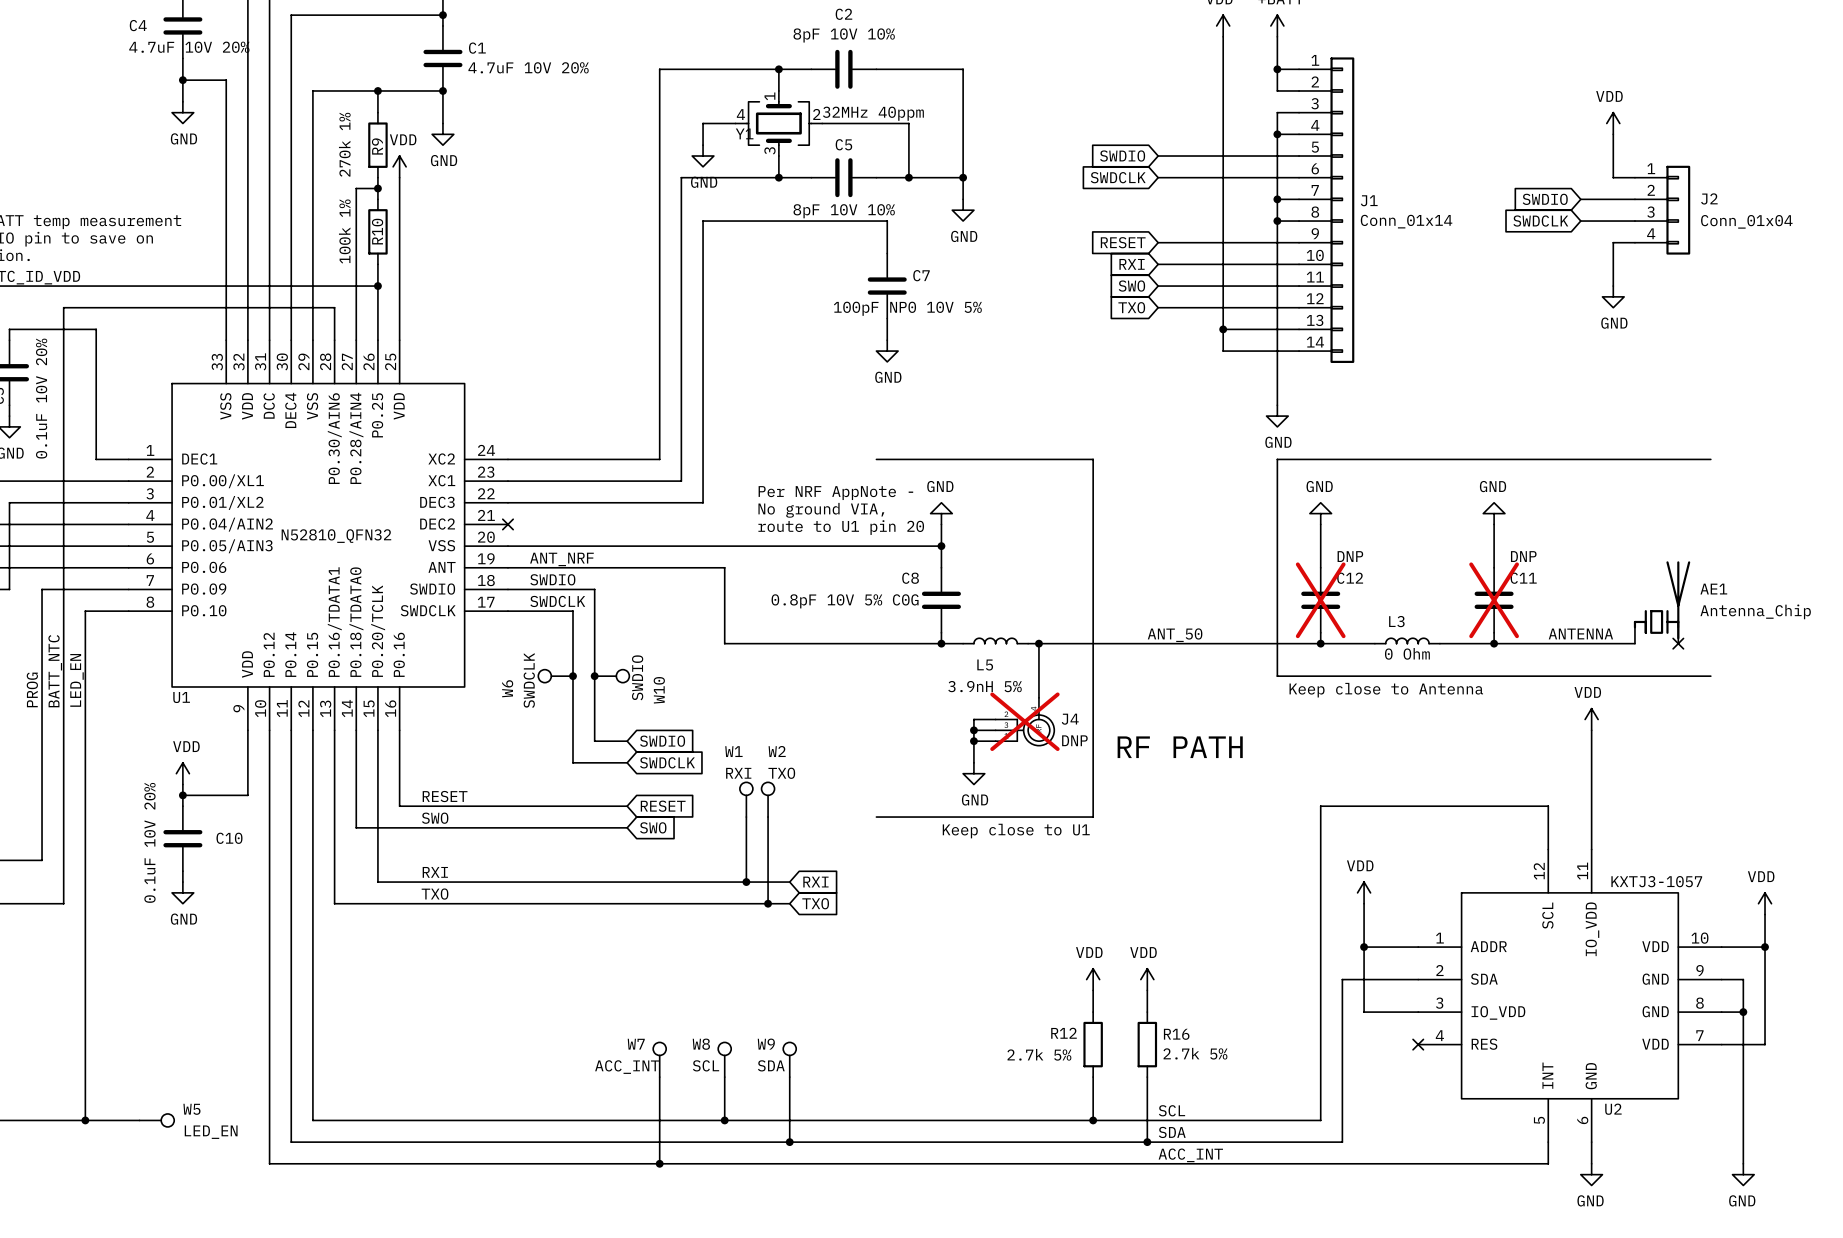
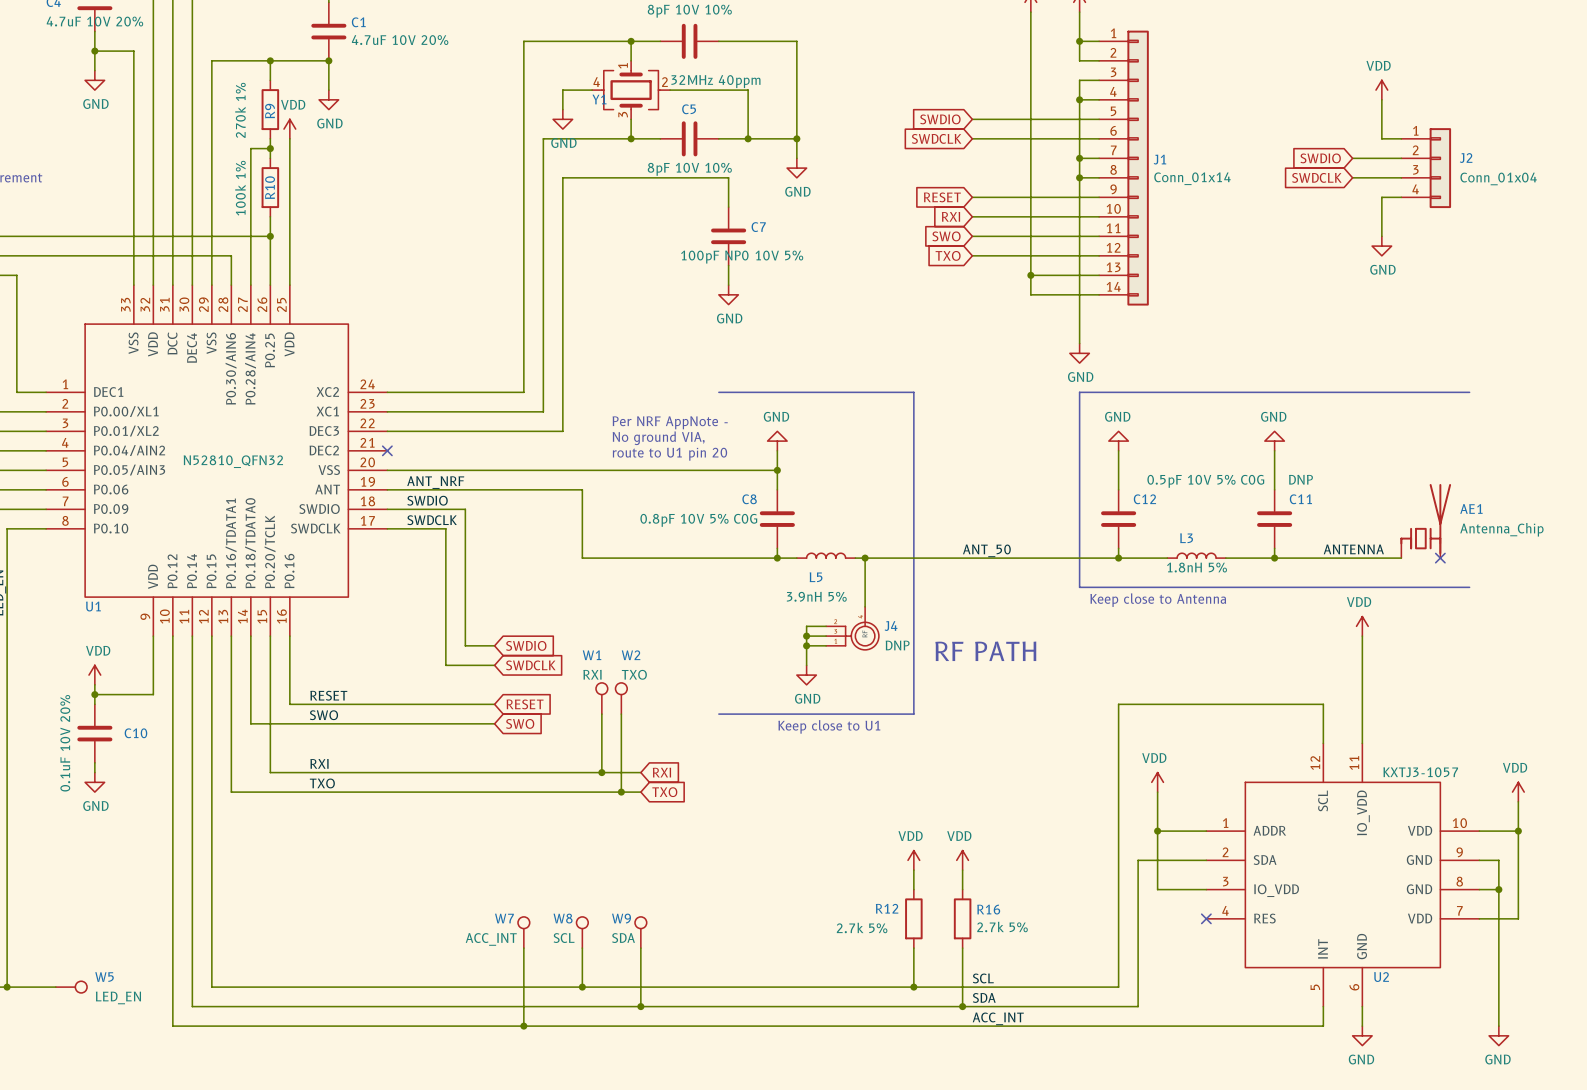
C12 value: DNP (1350, 556) -> 0.5pF 10V 5% C0G (1205, 481)
C12 do-not-place cross: (1320, 600) -> none
C11 do-not-place cross: (1494, 600) -> none
L3 value: 0 Ohm (1407, 653) -> 1.8nH 5% (1197, 567)
W6: SWDCLK (555, 676) -> none
junction: (573, 676) -> none
junction: (594, 676) -> none
W10: SWDIO (612, 676) -> none
J4 do-not-place cross: (1024, 721) -> none

